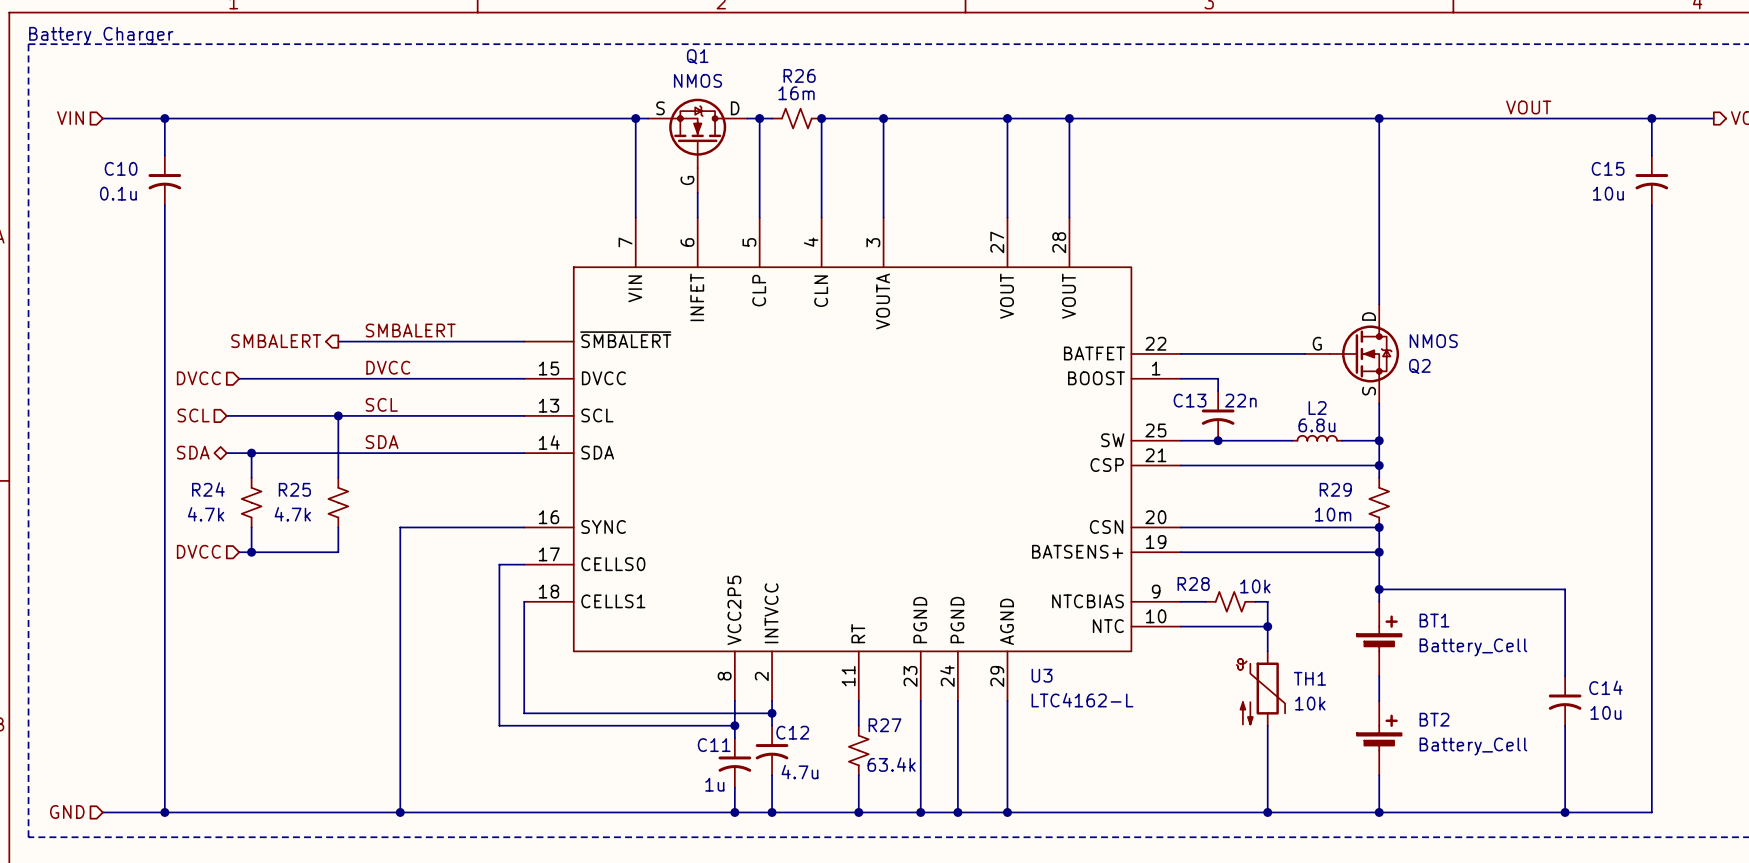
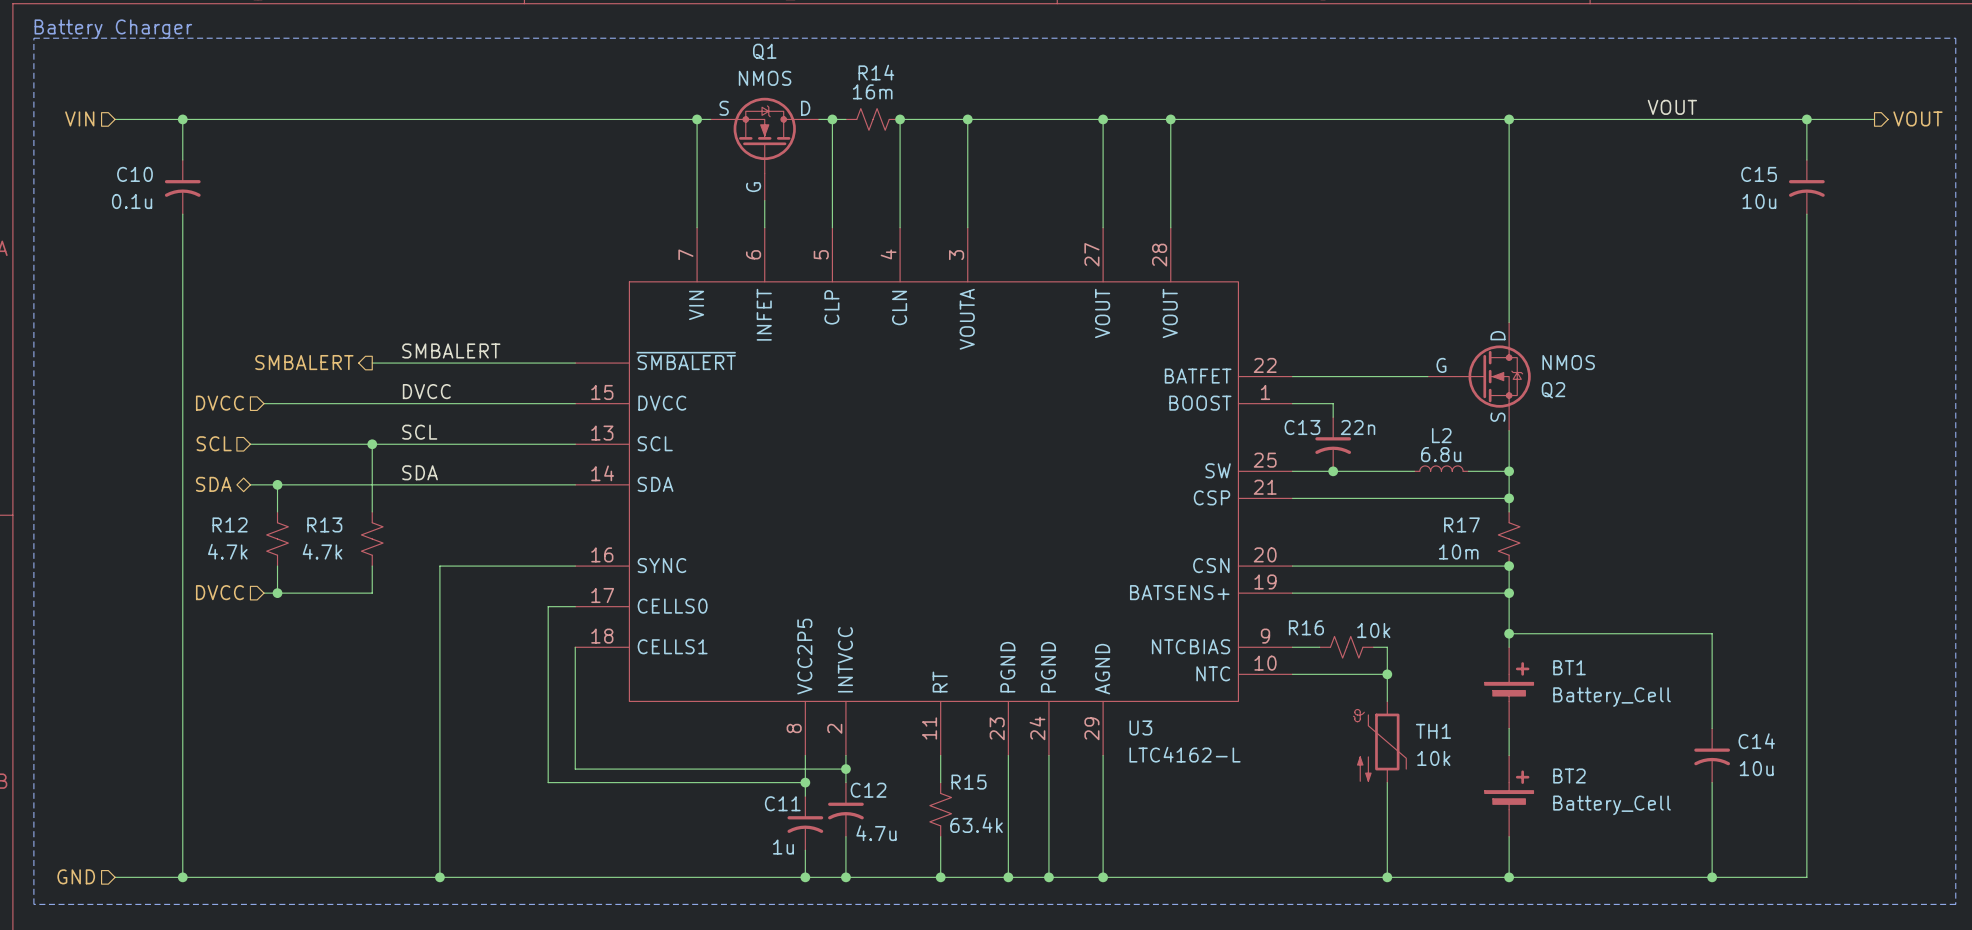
R26 name: R26 (799, 75) -> R14 (876, 72)
R24 name: R24 (208, 489) -> R12 (230, 524)
R25 name: R25 (294, 489) -> R13 (324, 524)
R29 name: R29 (1335, 489) -> R17 (1461, 524)
R28 name: R28 (1193, 584) -> R16 (1306, 627)
R27 name: R27 (885, 725) -> R15 (969, 782)

